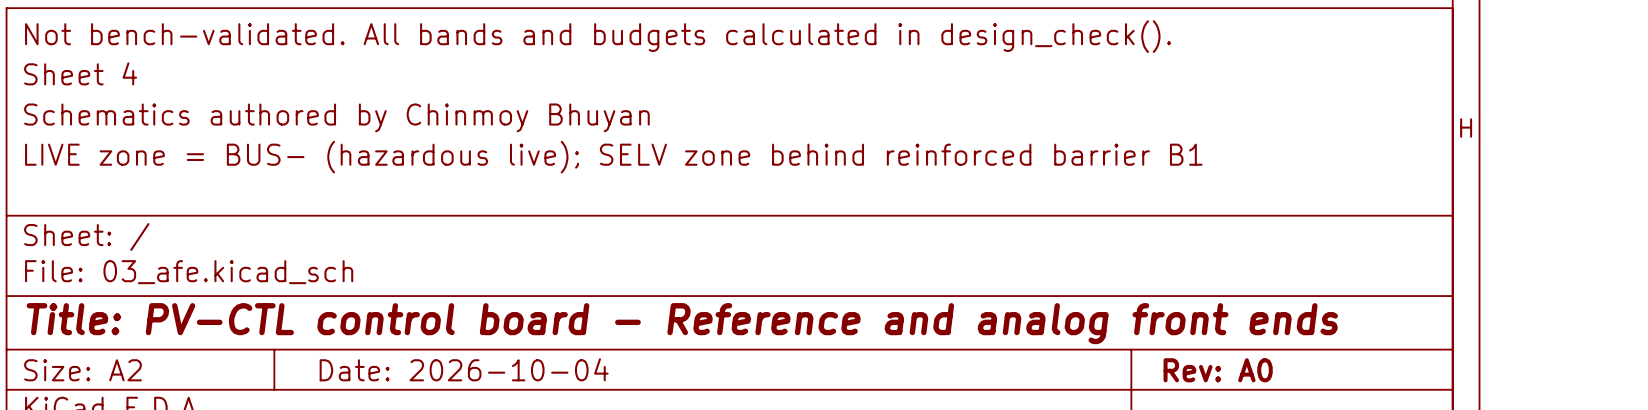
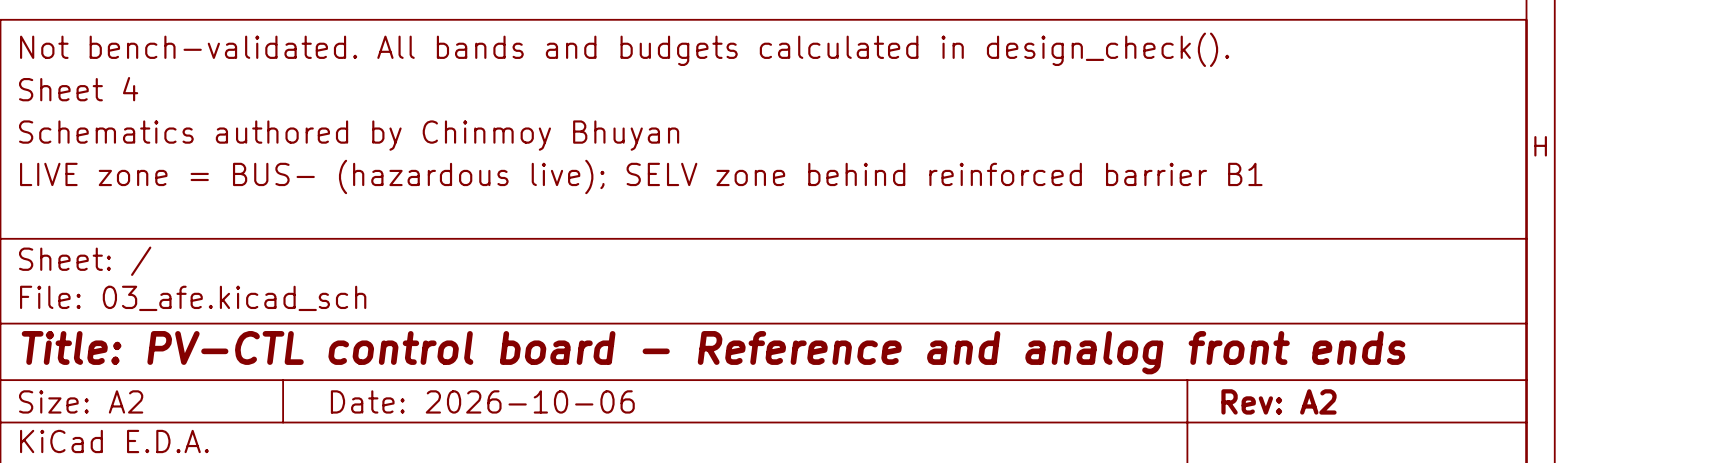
title block: Date: 2026-10-04 (464, 369) -> Date: 2026-10-06 (482, 401)
title block: Rev: A0 (1218, 370) -> Rev: A2 (1279, 401)

